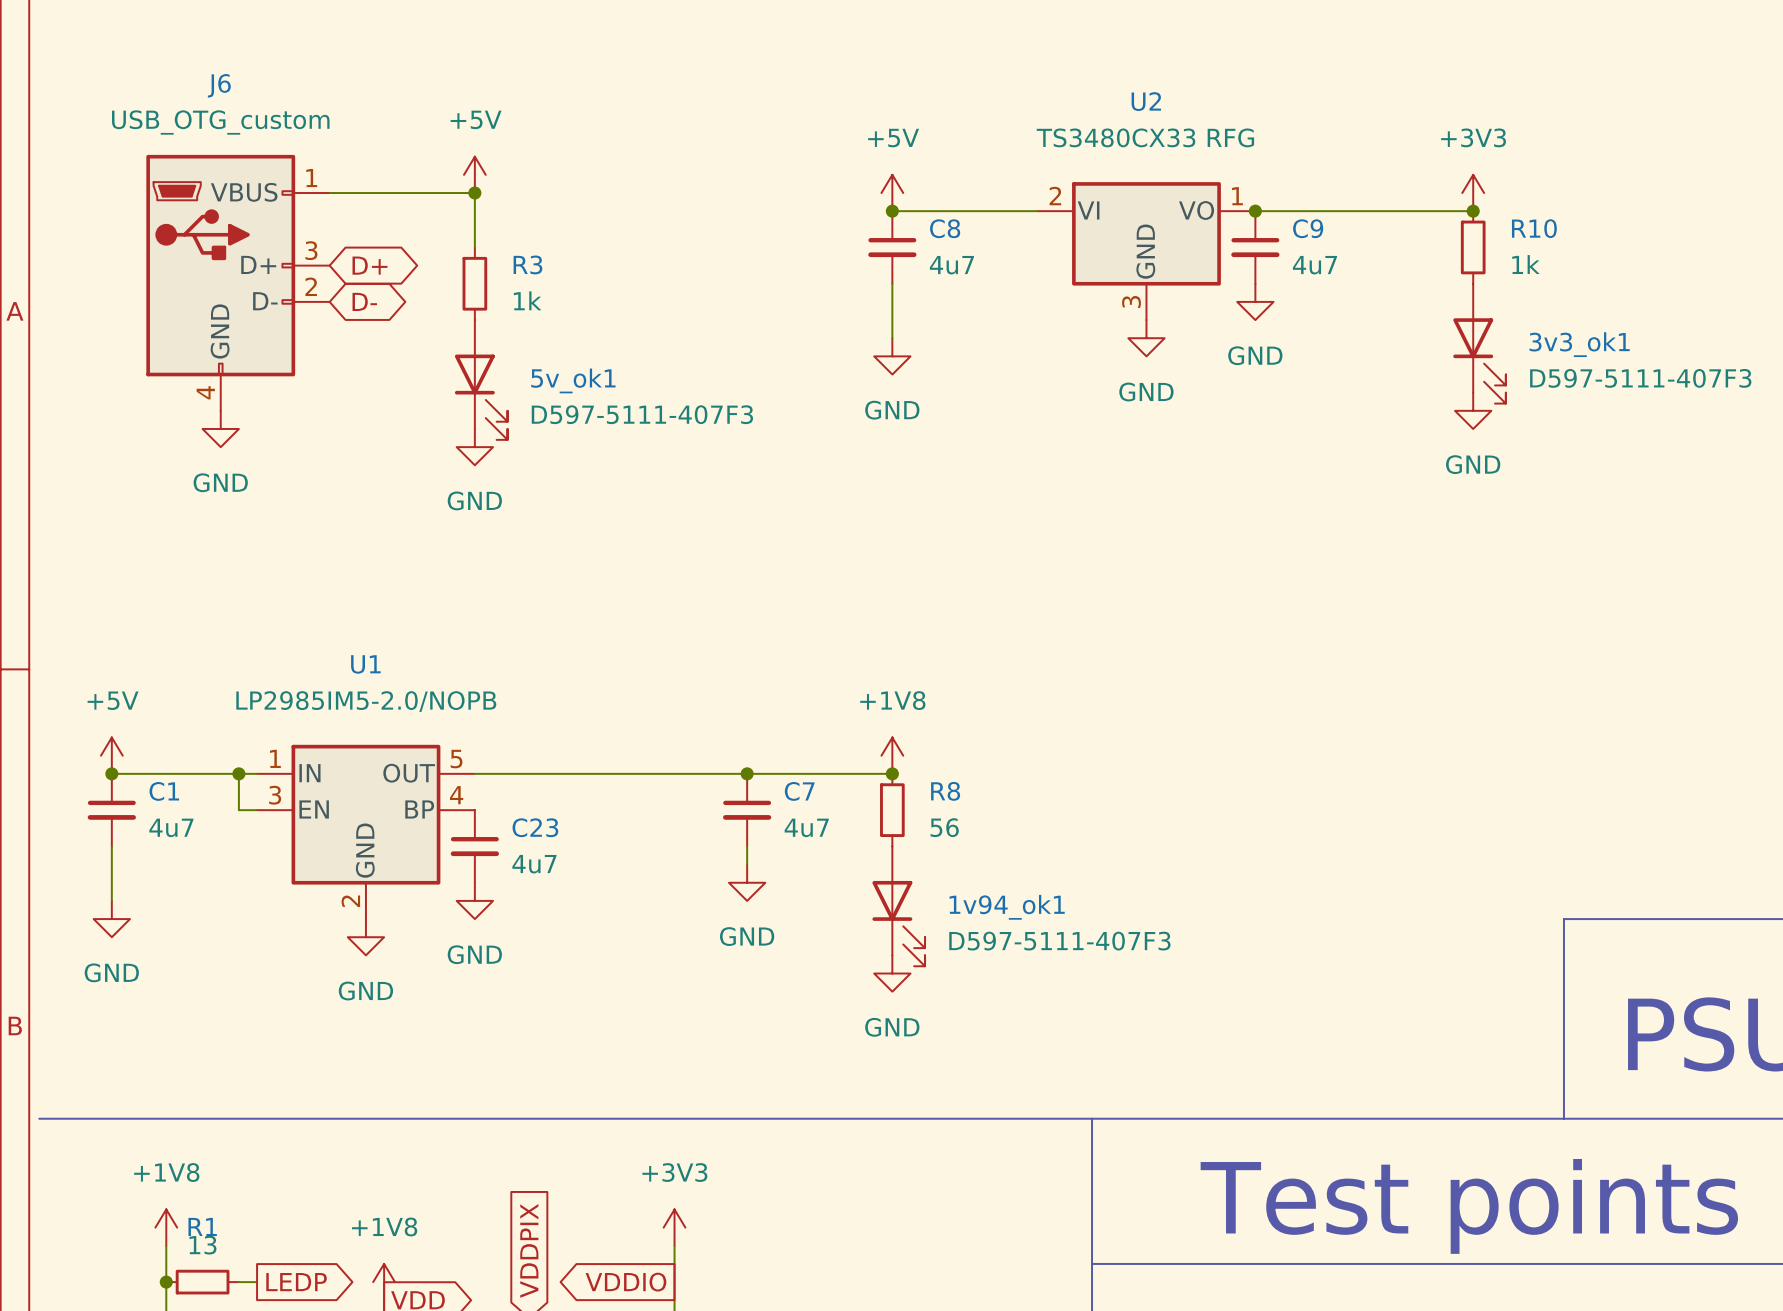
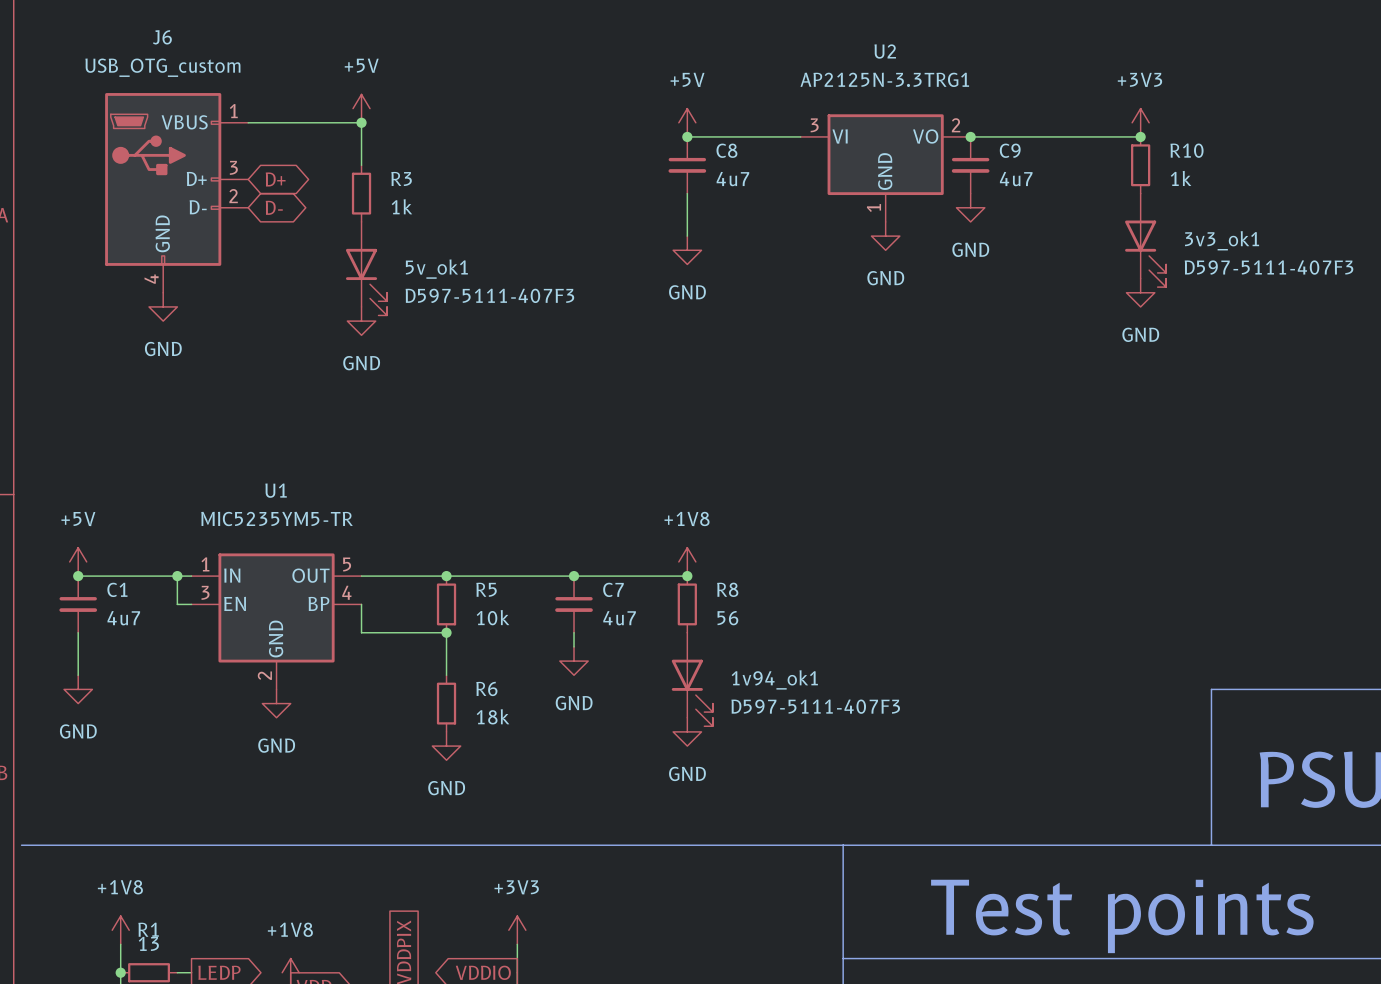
U2 value: TS3480CX33 RFG (1145, 137) -> AP2125N-3.3TRG1 (884, 79)
U2 pin number: 2 (1055, 196) -> 3 (814, 125)
U2 pin number: 1 (1237, 196) -> 2 (956, 125)
U2 pin number: 3 (1131, 301) -> 1 (873, 208)
U1 value: LP2985IM5-2.0/NOPB (366, 701) -> MIC5235YM5-TR (277, 518)
junction: none -> (446, 576)
wire: none -> (361, 604) (361, 632) (446, 632) (446, 675)
R5: none -> 10k (446, 604)
C23: 4u7 (474, 846) -> none
junction: none -> (446, 632)
power symbol position: GND (474, 900) -> GND (446, 746)
R6: none -> 18k (446, 703)

